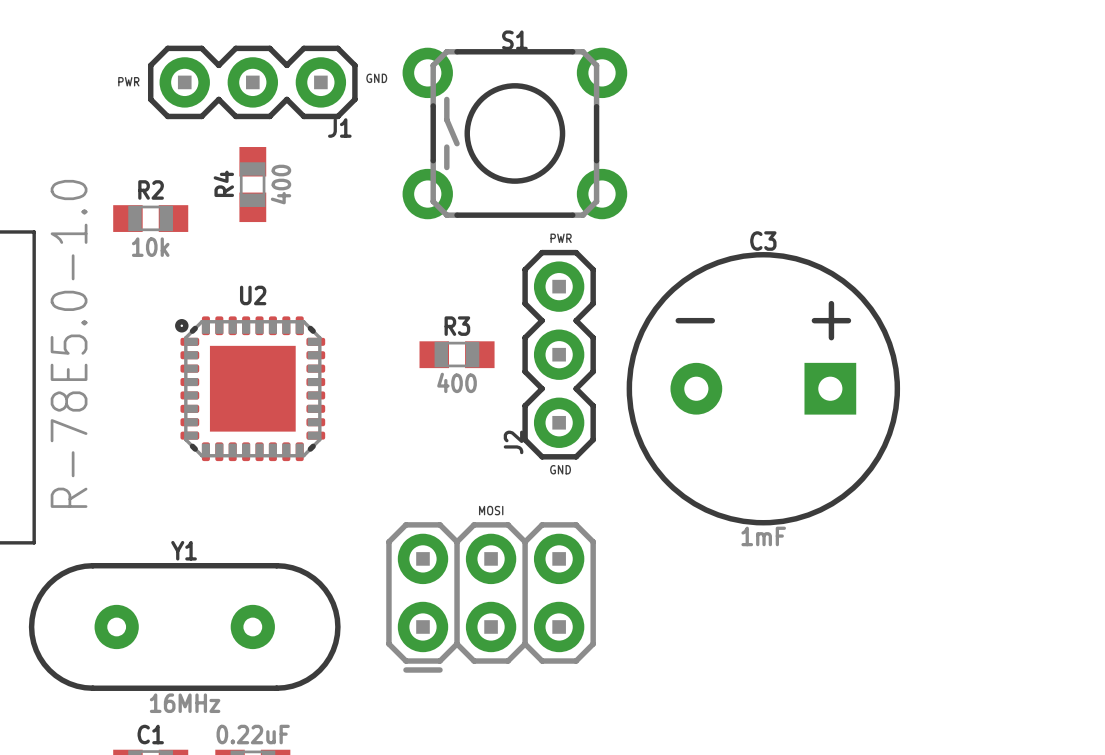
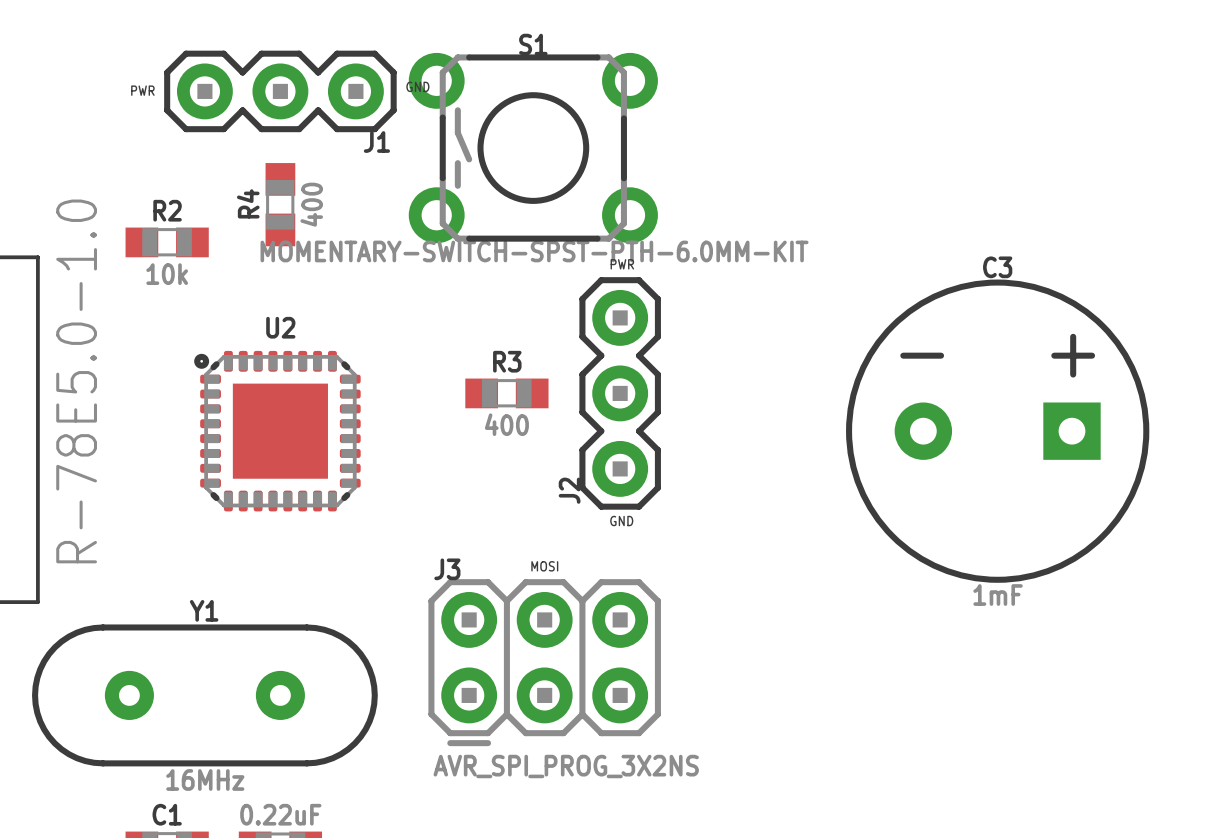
S1 position: (514, 133) -> (533, 148)
S1 value: none -> MOMENTARY-SWITCH-SPST-PTH-6.0MM-KIT (534, 251)
C3 position: (763, 388) -> (997, 431)
J3 name: none -> J3 (447, 569)
J3 value: none -> AVR_SPI_PROG_3X2NS (566, 766)

